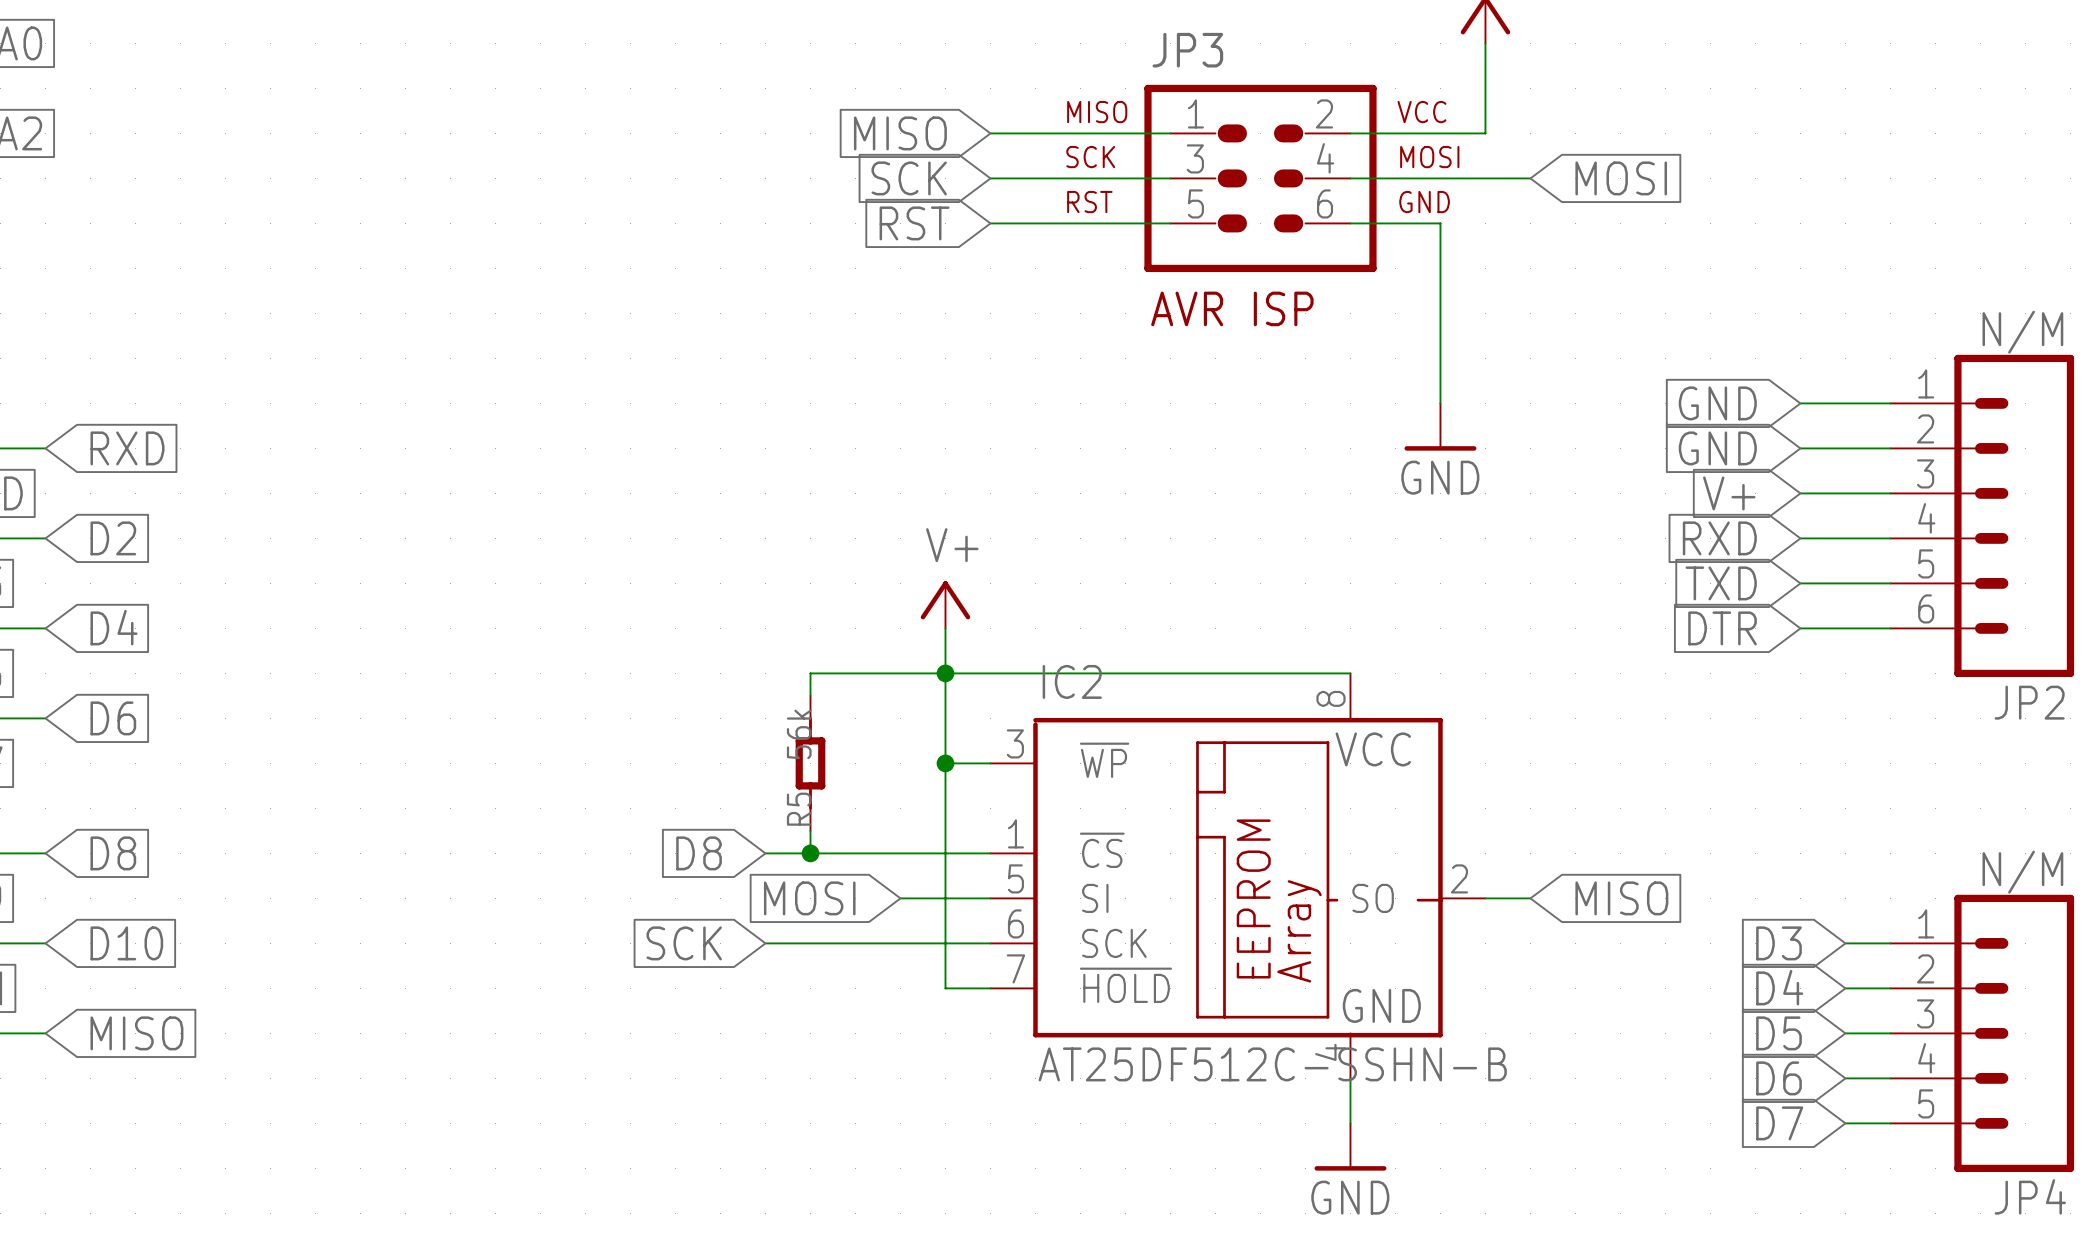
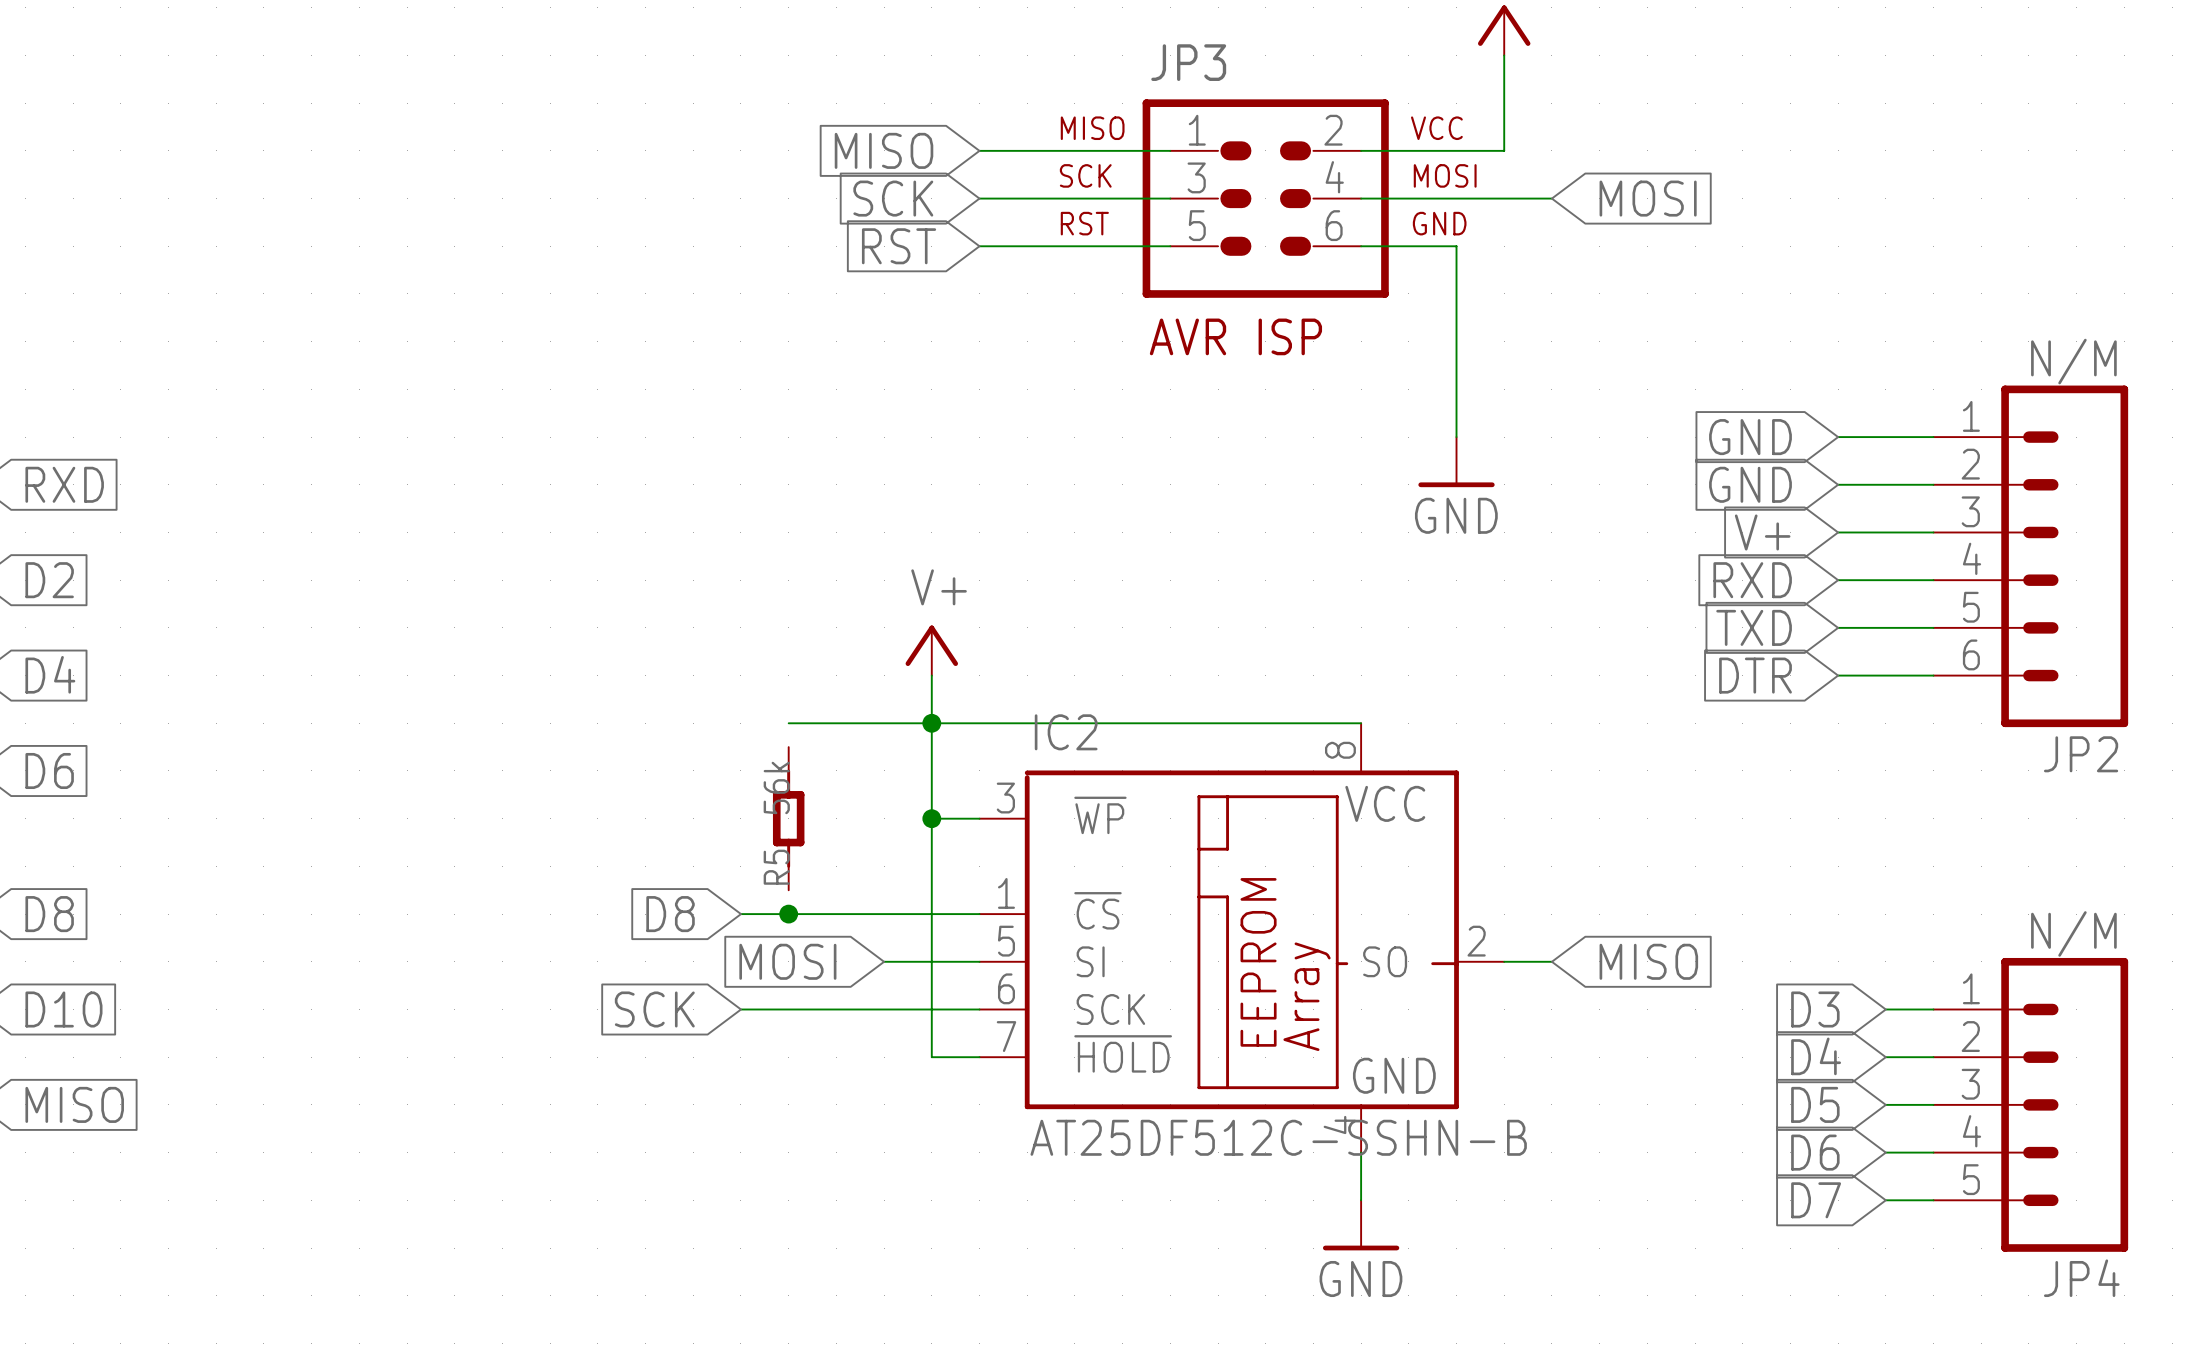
wire: (810, 673) (810, 695) -> none
wire: (810, 830) (810, 853) -> none

